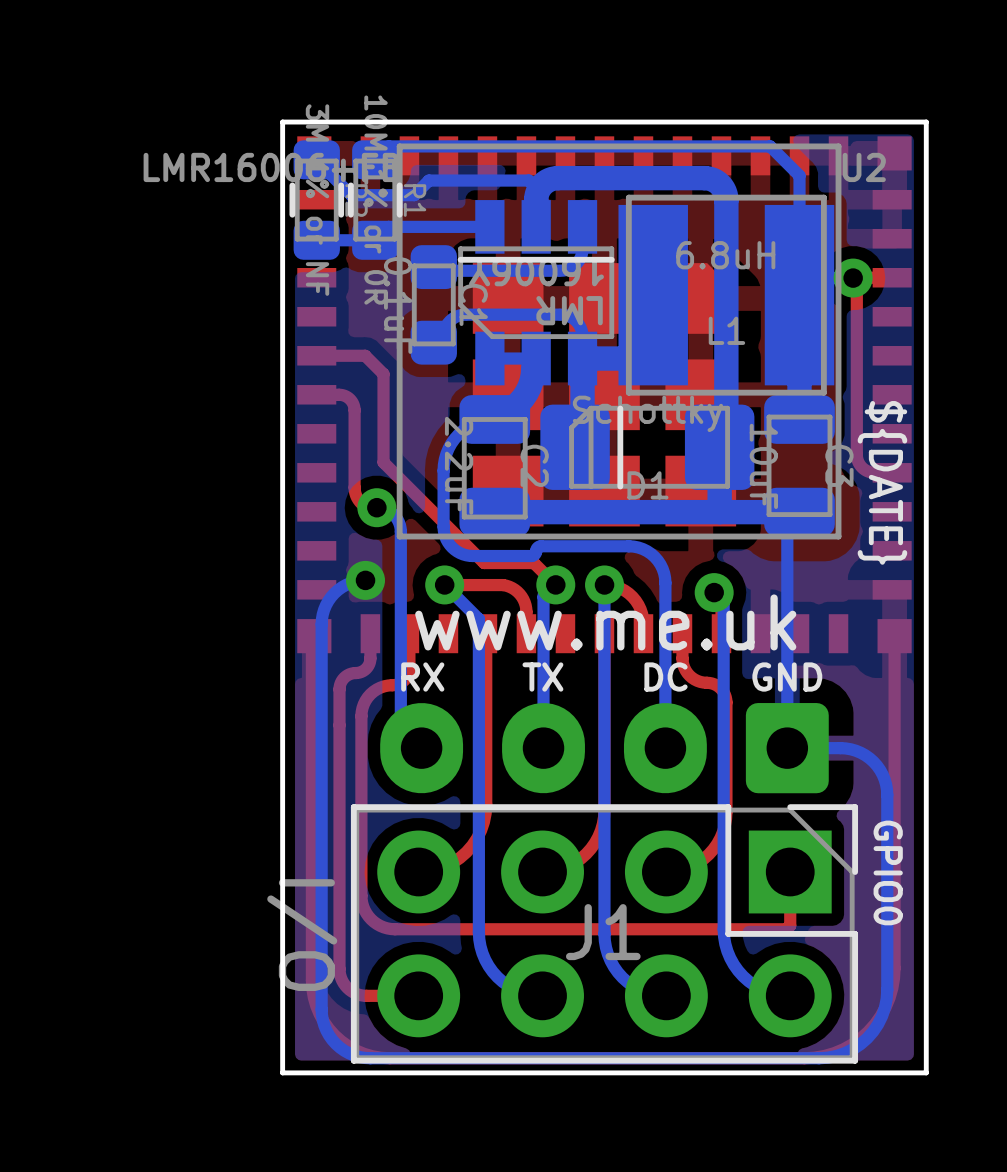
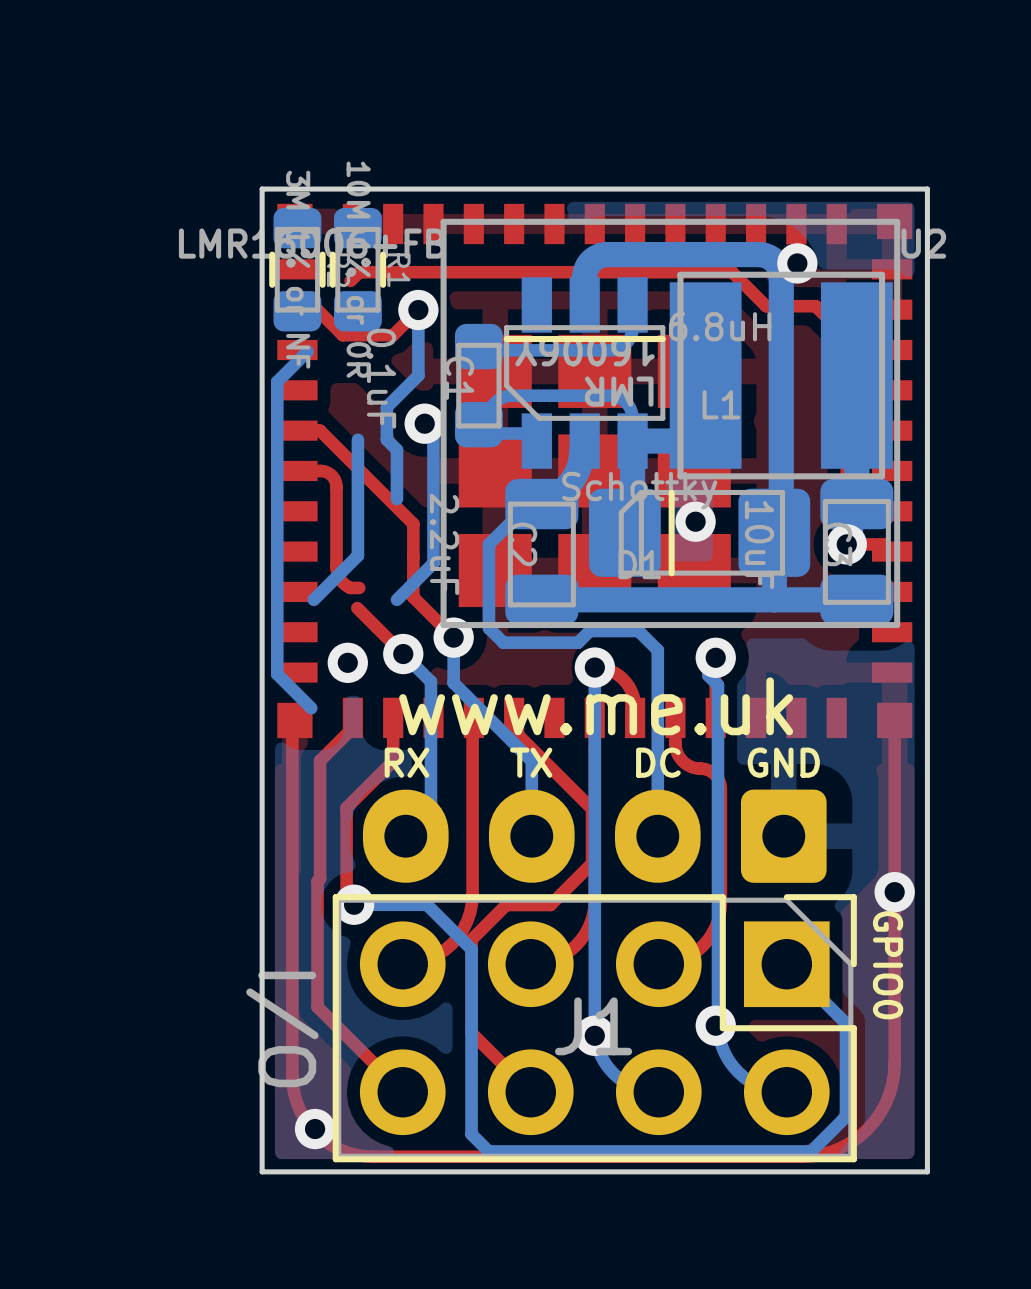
bottom track: (375, 159) (388, 146) (770, 146) (799, 175) (799, 295) (816, 278) (853, 278) -> none
bottom track: (316, 160) (351, 195) (414, 195) (428, 180) (528, 180) (536, 187) (536, 226) -> none
via: none -> (797, 263)
bottom track: (489, 226) (388, 226) (375, 240) (316, 240) -> none
top track: none -> (297, 309) (317, 309) (342, 335) (393, 335) (418, 310)
bottom track: none -> (418, 310) (418, 375) (386, 407) (386, 439) (396, 449) (396, 499)
via: none -> (418, 310)
via: (853, 278) -> none
bottom track: none -> (307, 351) (277, 381) (277, 674) (311, 708)
top track: (856, 281) (857, 458) (860, 466) (868, 471) (892, 472) -> (350, 280) (359, 272) (732, 272) (766, 306) (815, 306) (859, 350) (846, 362) (846, 544) (884, 544) (892, 551)
U2 position: (619, 341) -> (670, 423)
bottom track: none -> (424, 423) (433, 432) (433, 563) (396, 599)
via: none -> (424, 423)
top track: (338, 355) (365, 355) (383, 374) (383, 462) (484, 563) (533, 563) (555, 584) -> (320, 430) (413, 523) (413, 597) (453, 637)
bottom track: none -> (357, 439) (357, 555) (313, 599)
bottom track: (494, 419) (477, 422) (462, 430) (454, 438) (446, 453) (443, 470) (443, 530) (446, 539) (452, 547) (460, 553) (469, 555) (531, 556) (534, 554) (536, 548) (540, 546) (633, 546) (642, 549) (654, 556) (662, 568) (665, 582) -> (541, 491) (488, 544) (488, 628) (503, 642) (578, 642) (589, 631) (638, 631) (657, 650) (657, 665)
via: none -> (695, 521)
via: none -> (846, 544)
text: ${DATE} (882, 482) -> none
bottom track: (376, 507) (386, 509) (393, 514) (400, 528) (401, 730) (406, 742) (413, 746) (421, 748) -> (403, 654) (430, 681) (430, 811) (405, 836)
via: (376, 507) -> none
bottom track: (799, 512) (787, 524) (787, 748) (845, 748) (860, 752) (869, 758) (880, 770) (886, 784) (887, 794) (887, 989) (884, 1007) (878, 1024) (867, 1038) (845, 1053) (827, 1057) (370, 1058) (354, 1055) (335, 1043) (326, 1030) (321, 1009) (321, 619) (325, 605) (338, 589) (351, 582) (365, 580) -> none
top track: none -> (357, 608) (403, 654)
via: none -> (453, 637)
via: none -> (403, 654)
bottom track: (444, 584) (478, 619) (478, 932) (480, 946) (488, 966) (502, 981) (521, 992) (542, 995) -> none
via: (444, 584) -> none
bottom track: (555, 584) (547, 587) (543, 595) (543, 675) -> (453, 637) (453, 682) (531, 761)
via: (555, 584) -> none
top track: (444, 585) (503, 585) (512, 588) (519, 594) (524, 602) (526, 633) -> (530, 1092) (471, 1033) (471, 939) (506, 905) (550, 905) (592, 863) (592, 808) (514, 731) (514, 717)
via position: (714, 592) -> (715, 657)
top track: (370, 643) (370, 660) (367, 667) (361, 671) (345, 676) (339, 687) (339, 971) (345, 985) (357, 994) (418, 995) -> (352, 728) (320, 760) (317, 1007) (402, 1092)
top track: (409, 668) (407, 676) (402, 681) (380, 687) (370, 694) (363, 704) (361, 712) (361, 899) (366, 913) (380, 925) (394, 929) (786, 929) (790, 925) (790, 871) -> (393, 753) (393, 761) (346, 807) (346, 897) (354, 904)
via: none -> (894, 892)
bottom track: none -> (354, 904) (427, 904) (471, 949) (471, 1134) (488, 1151) (811, 1151) (846, 1116) (846, 1023) (786, 964)
via: none -> (354, 904)
via: none -> (715, 1025)
via: none -> (594, 1035)
via: none -> (315, 1129)

